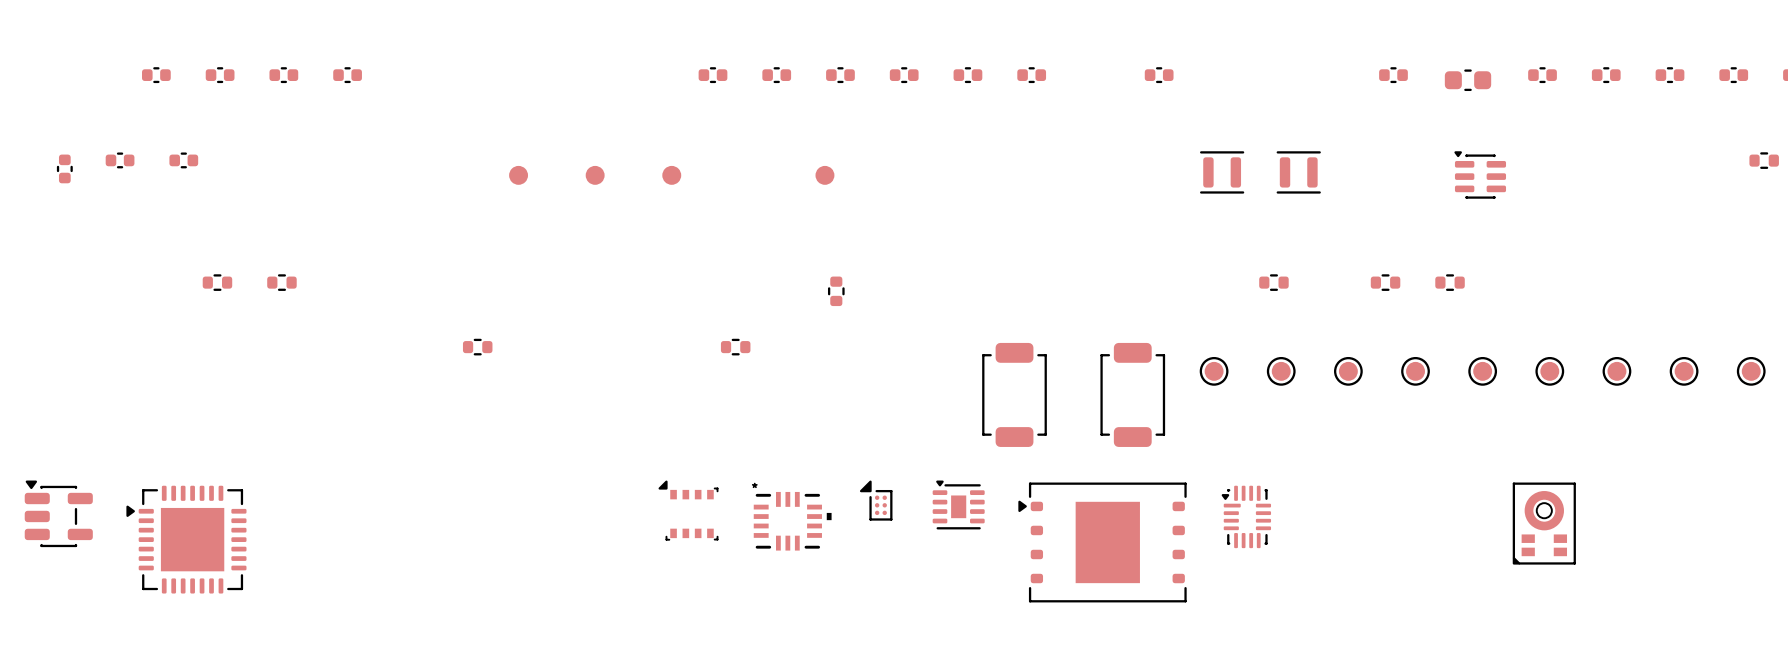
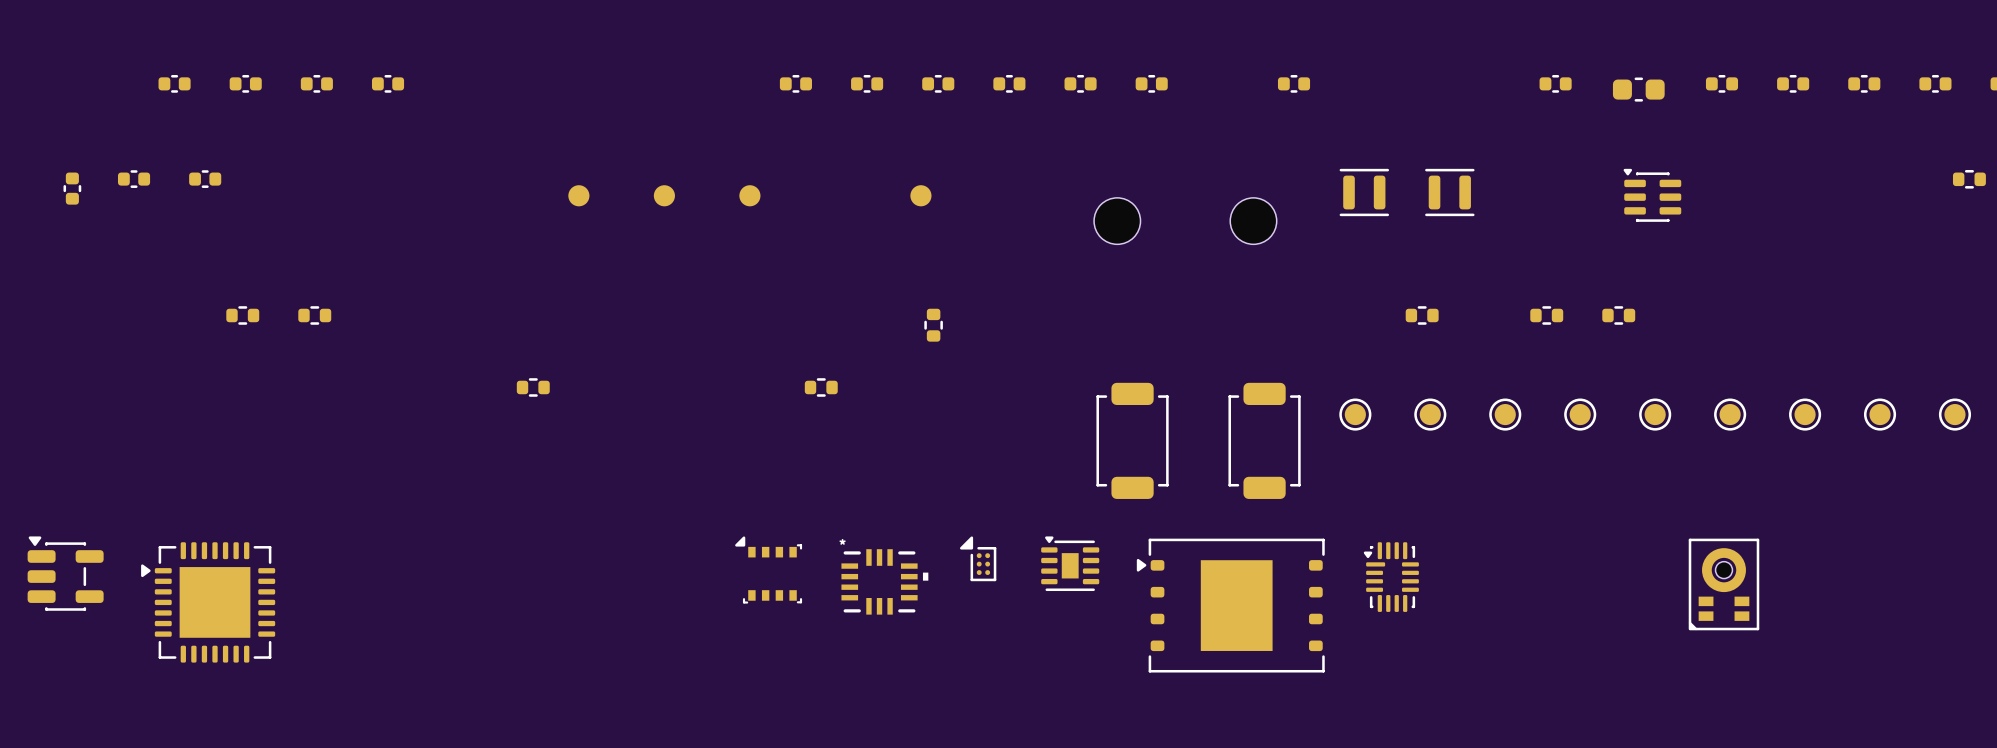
part: none -> (1117, 221)
part: none -> (1253, 221)

